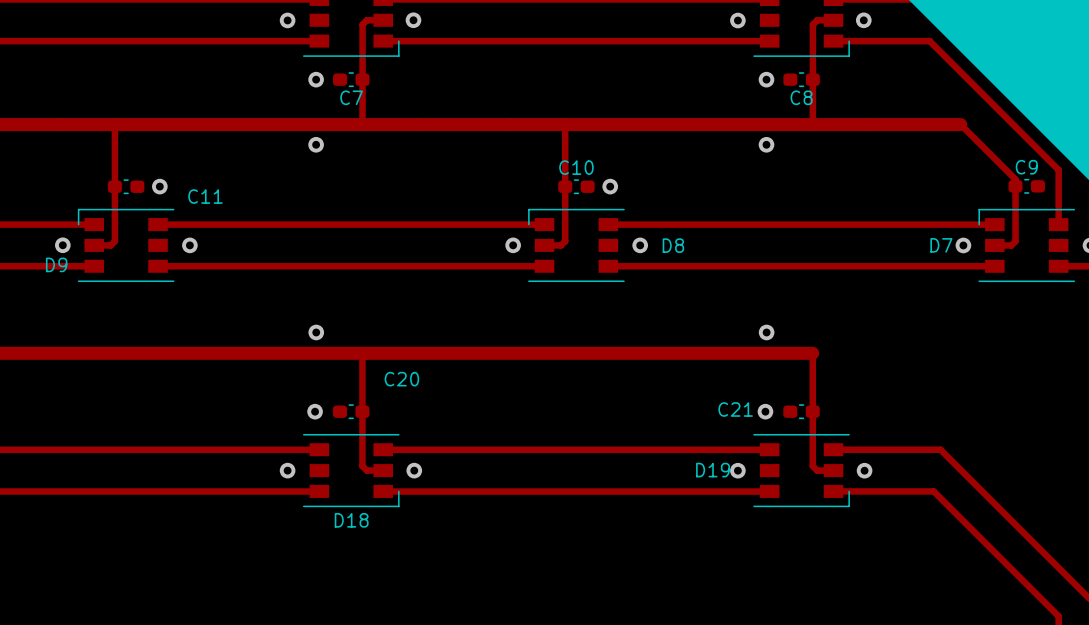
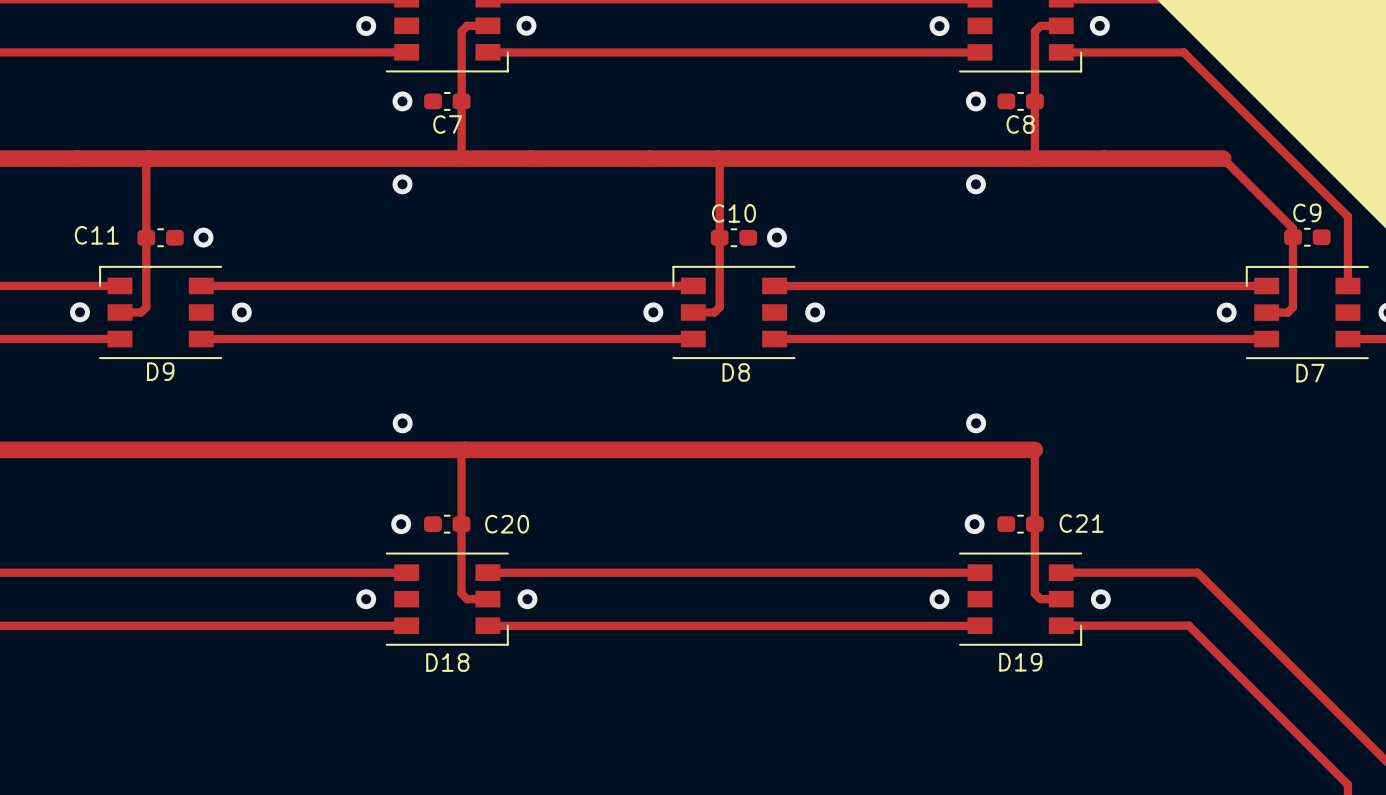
C11 name position: C11 (205, 196) -> C11 (96, 235)
D8 name position: D8 (673, 245) -> D8 (736, 372)
D7 name position: D7 (941, 245) -> D7 (1310, 373)
D9 name position: D9 (56, 264) -> D9 (160, 371)
C20 name position: C20 (401, 379) -> C20 (507, 524)
C21 name position: C21 (735, 409) -> C21 (1081, 523)
D19 name position: D19 (713, 470) -> D19 (1020, 662)

